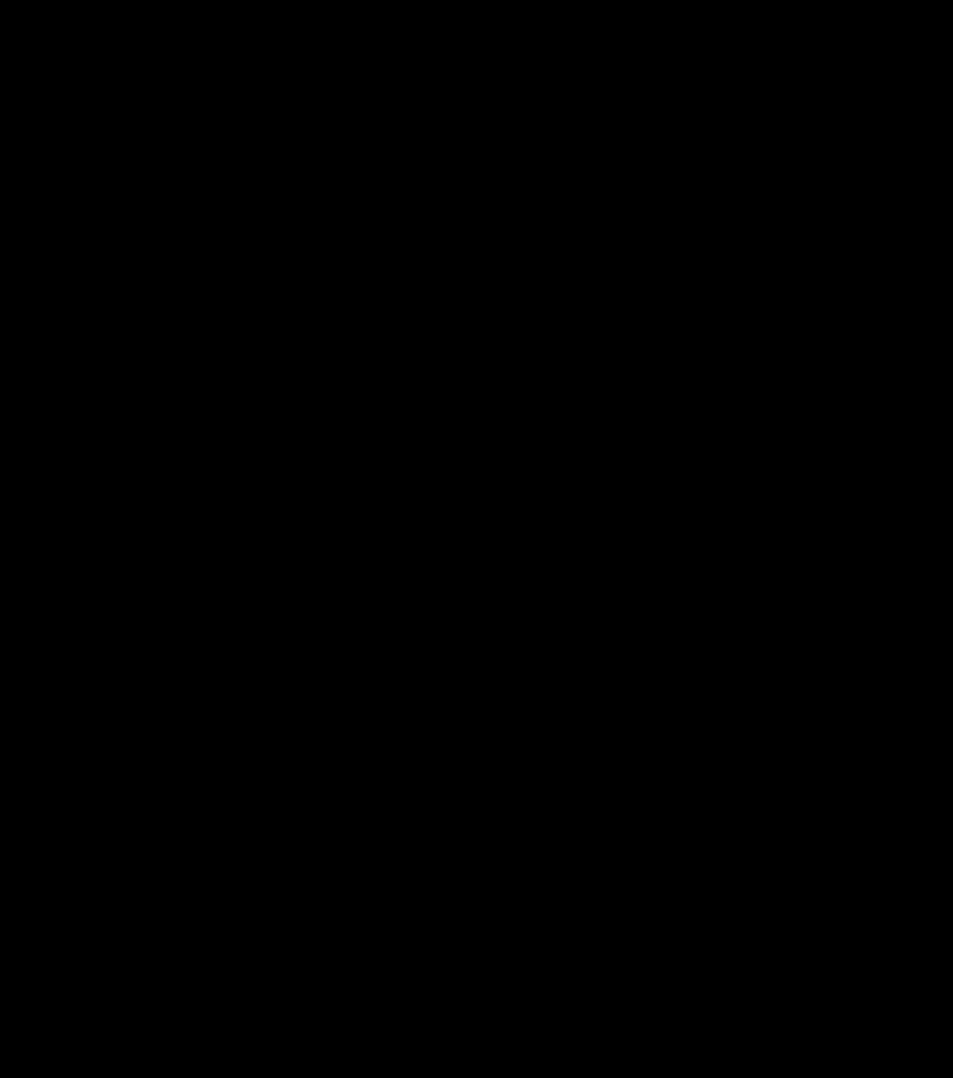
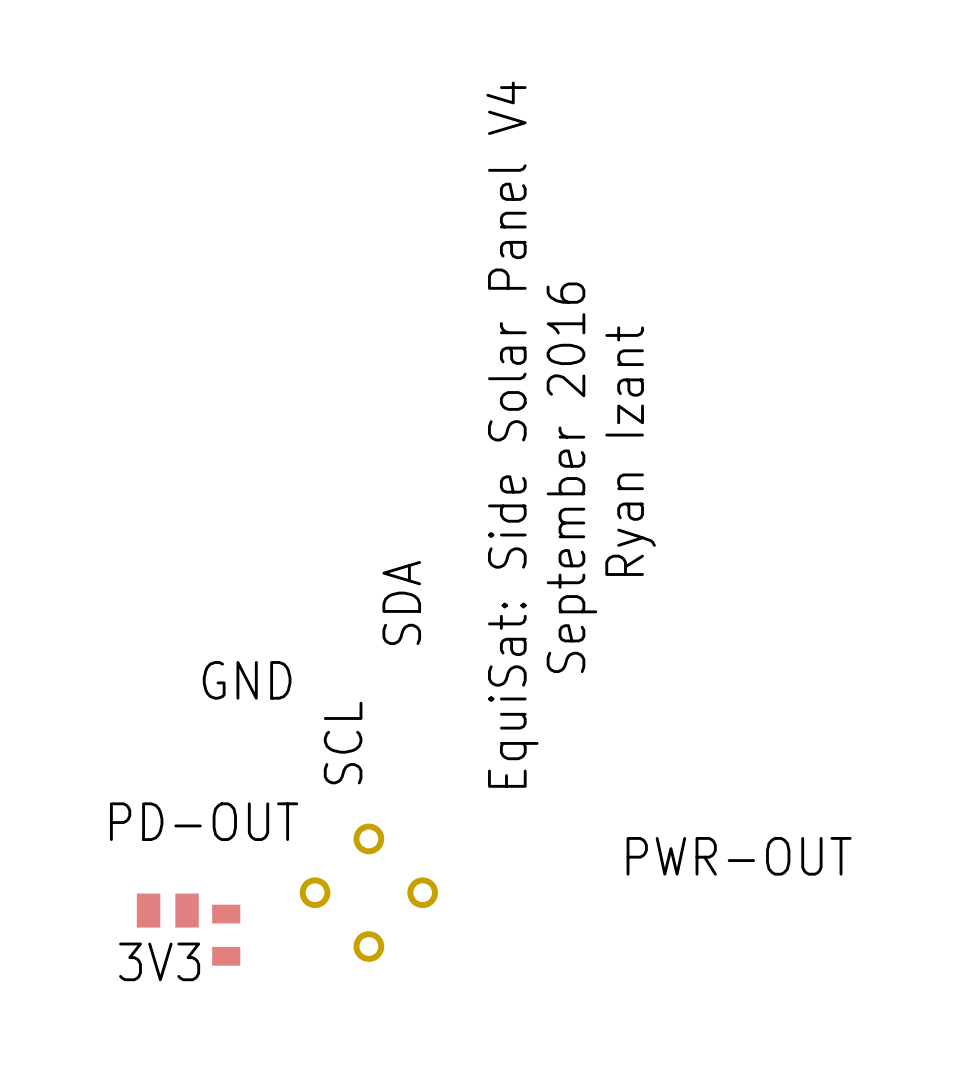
text: none -> Ryan Izant (630, 451)
text: none -> EquiSat: Side Solar Panel V4 (512, 434)
text: none -> September 2016 (571, 477)
text: none -> SDA (401, 603)
text: none -> GND (247, 680)
text: none -> SCL (343, 743)
text: none -> PD-OUT (204, 821)
text: none -> PWR-OUT (739, 856)
part: none -> (368, 892)
part: none -> (167, 910)
part: none -> (226, 935)
text: none -> 3V3 (159, 961)

